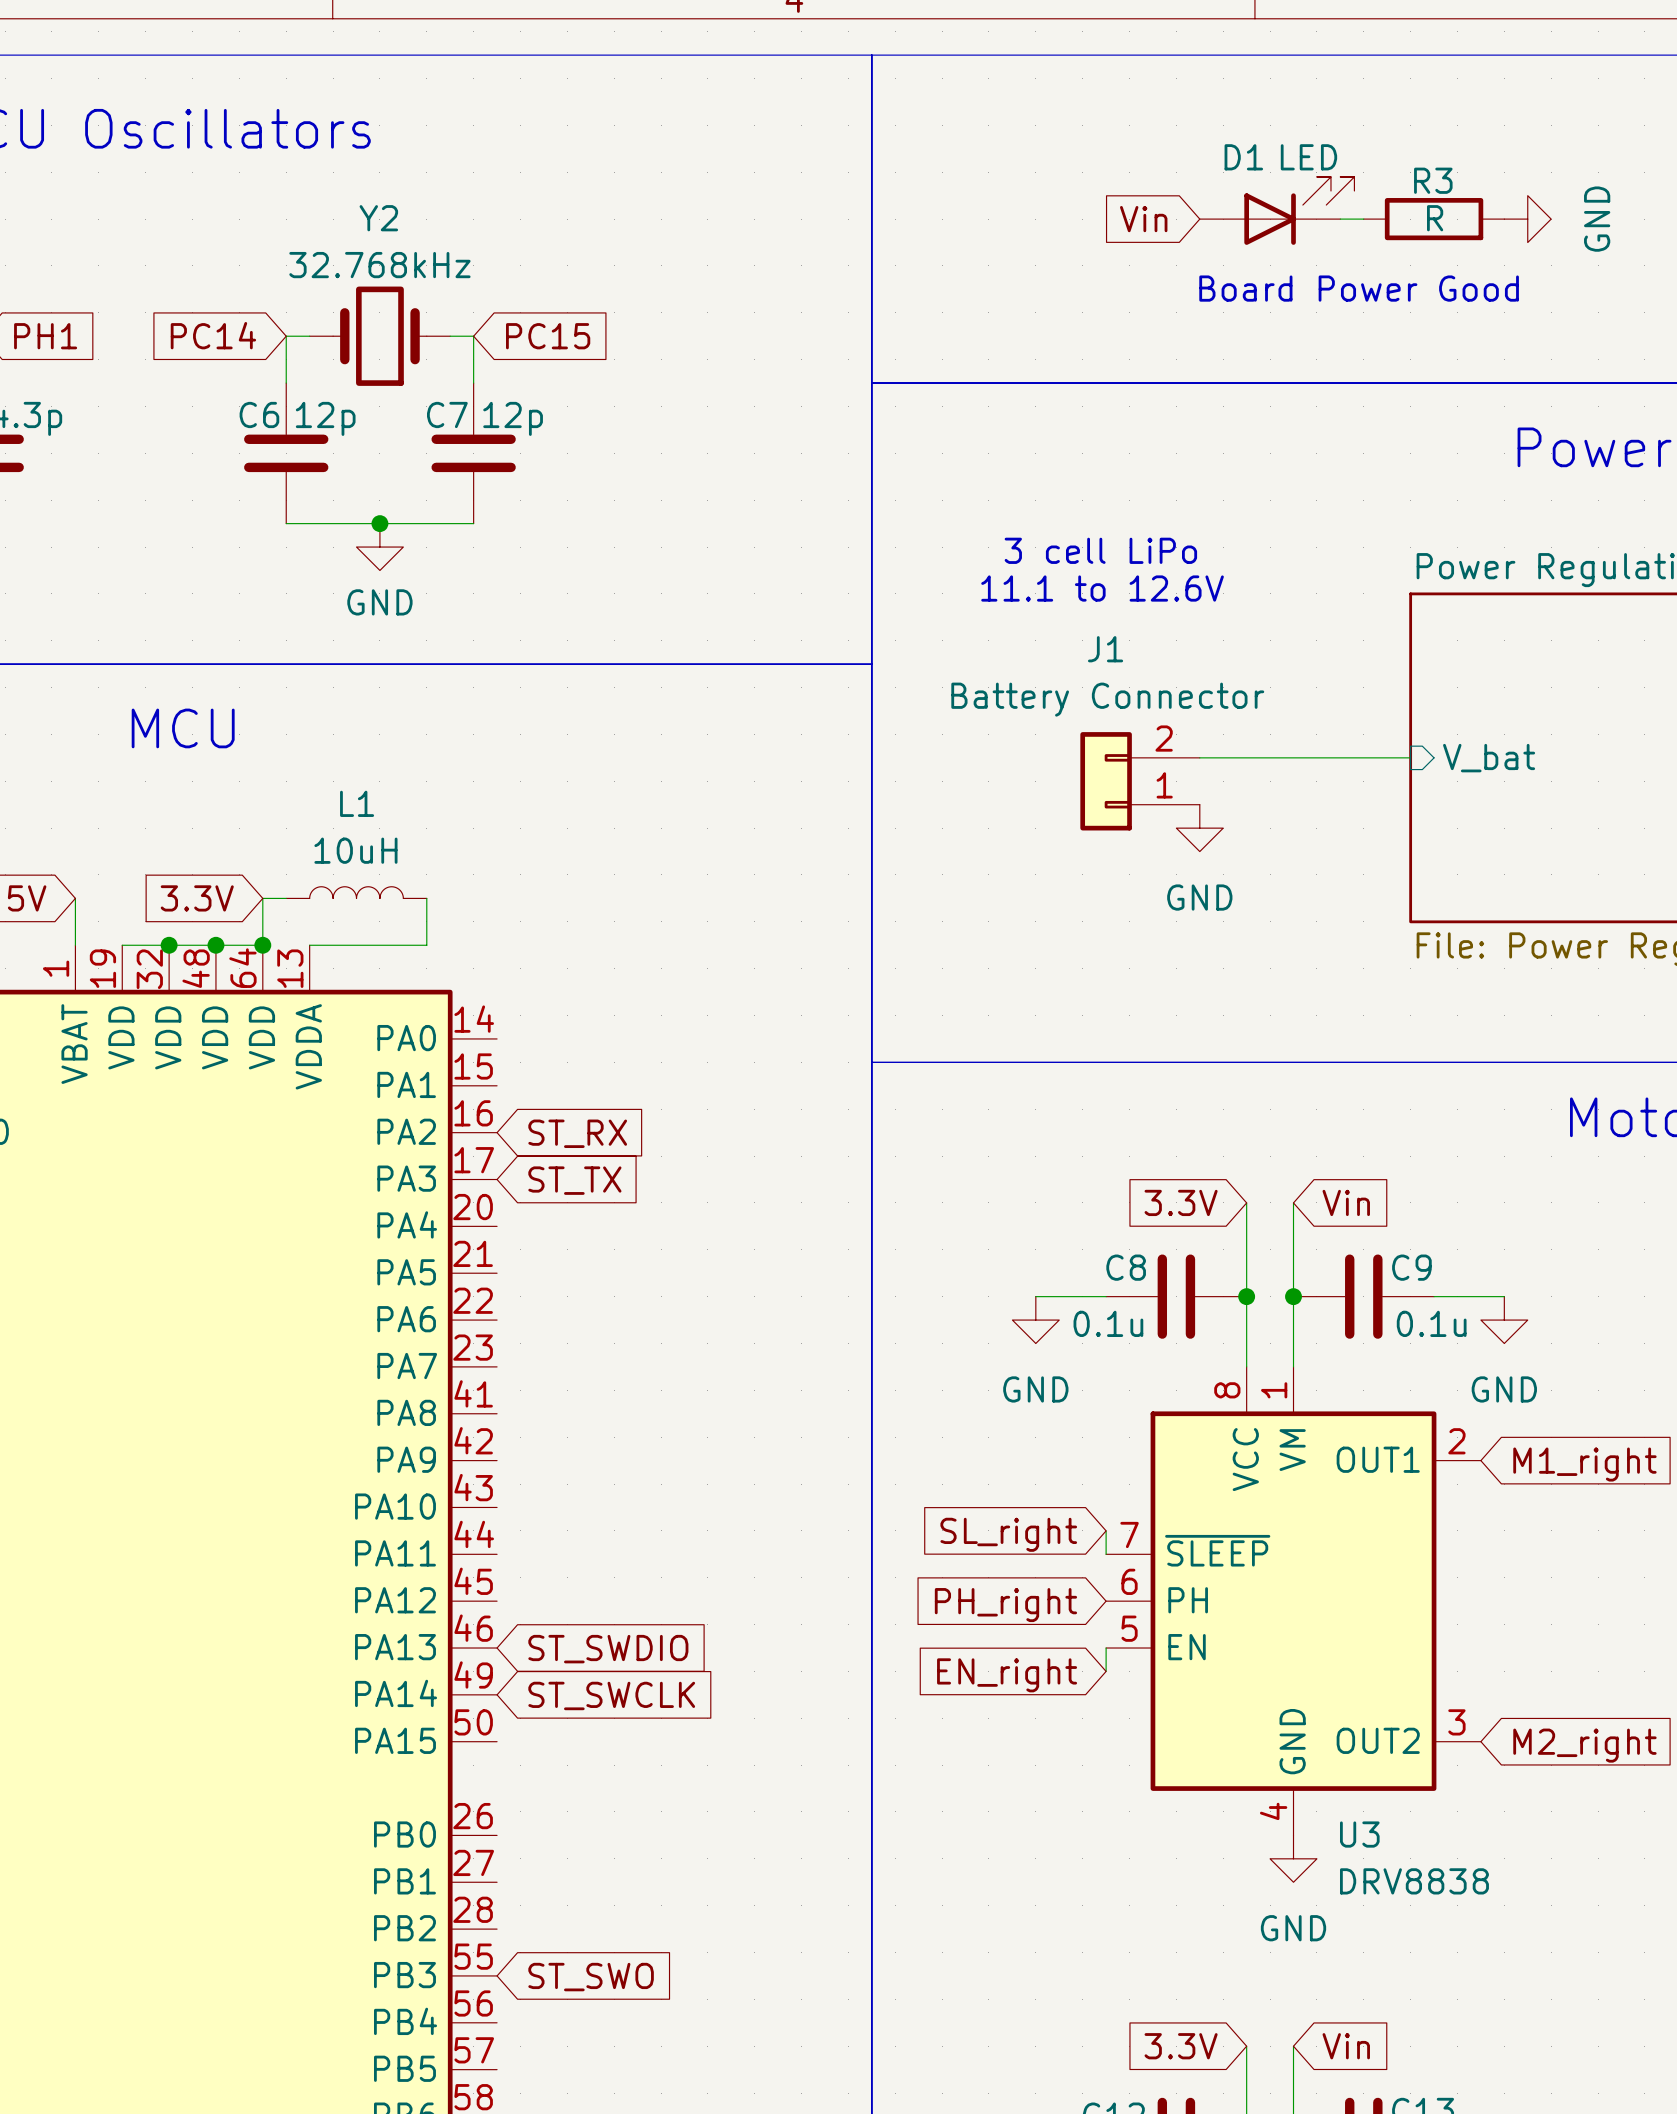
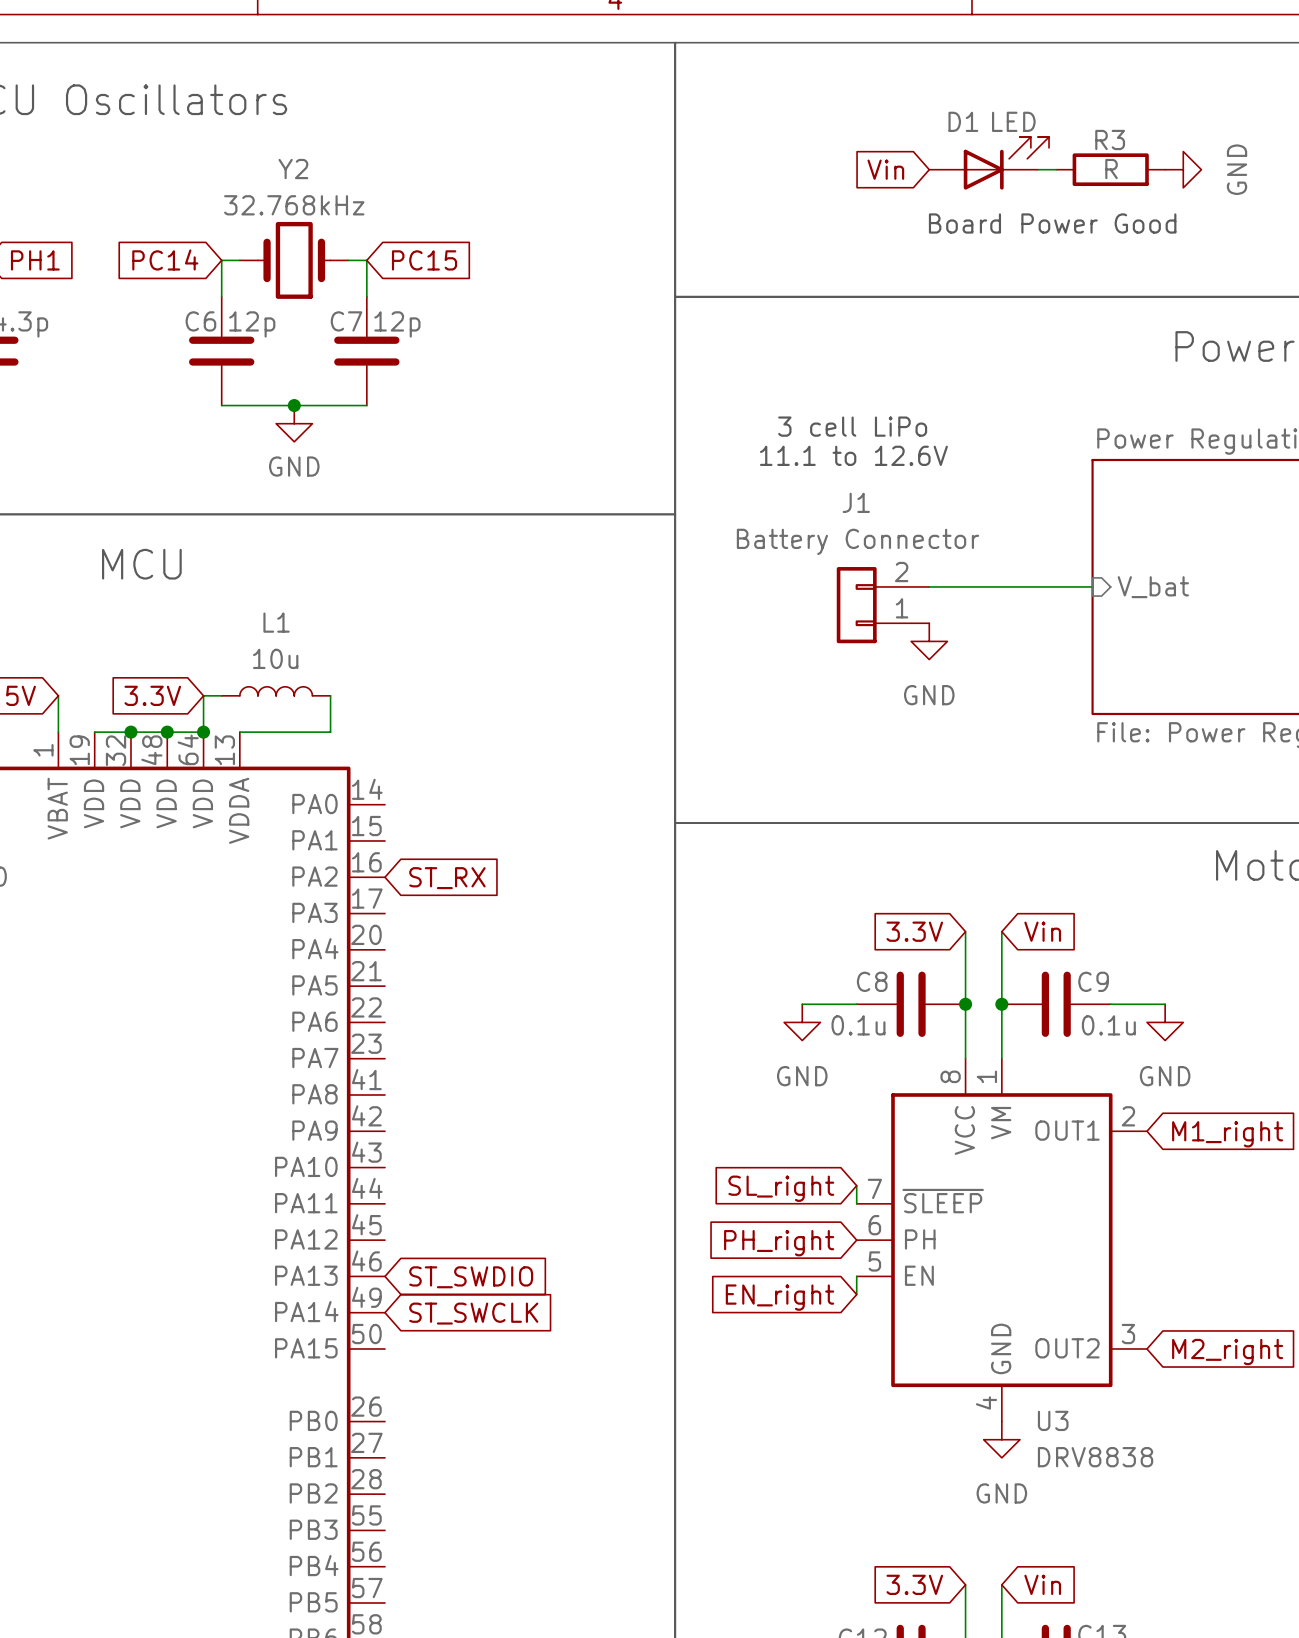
L1 value: 10uH (355, 850) -> 10u (275, 658)
global label: ST_TX (574, 1180) -> none
global label: ST_SWO (591, 1977) -> none

